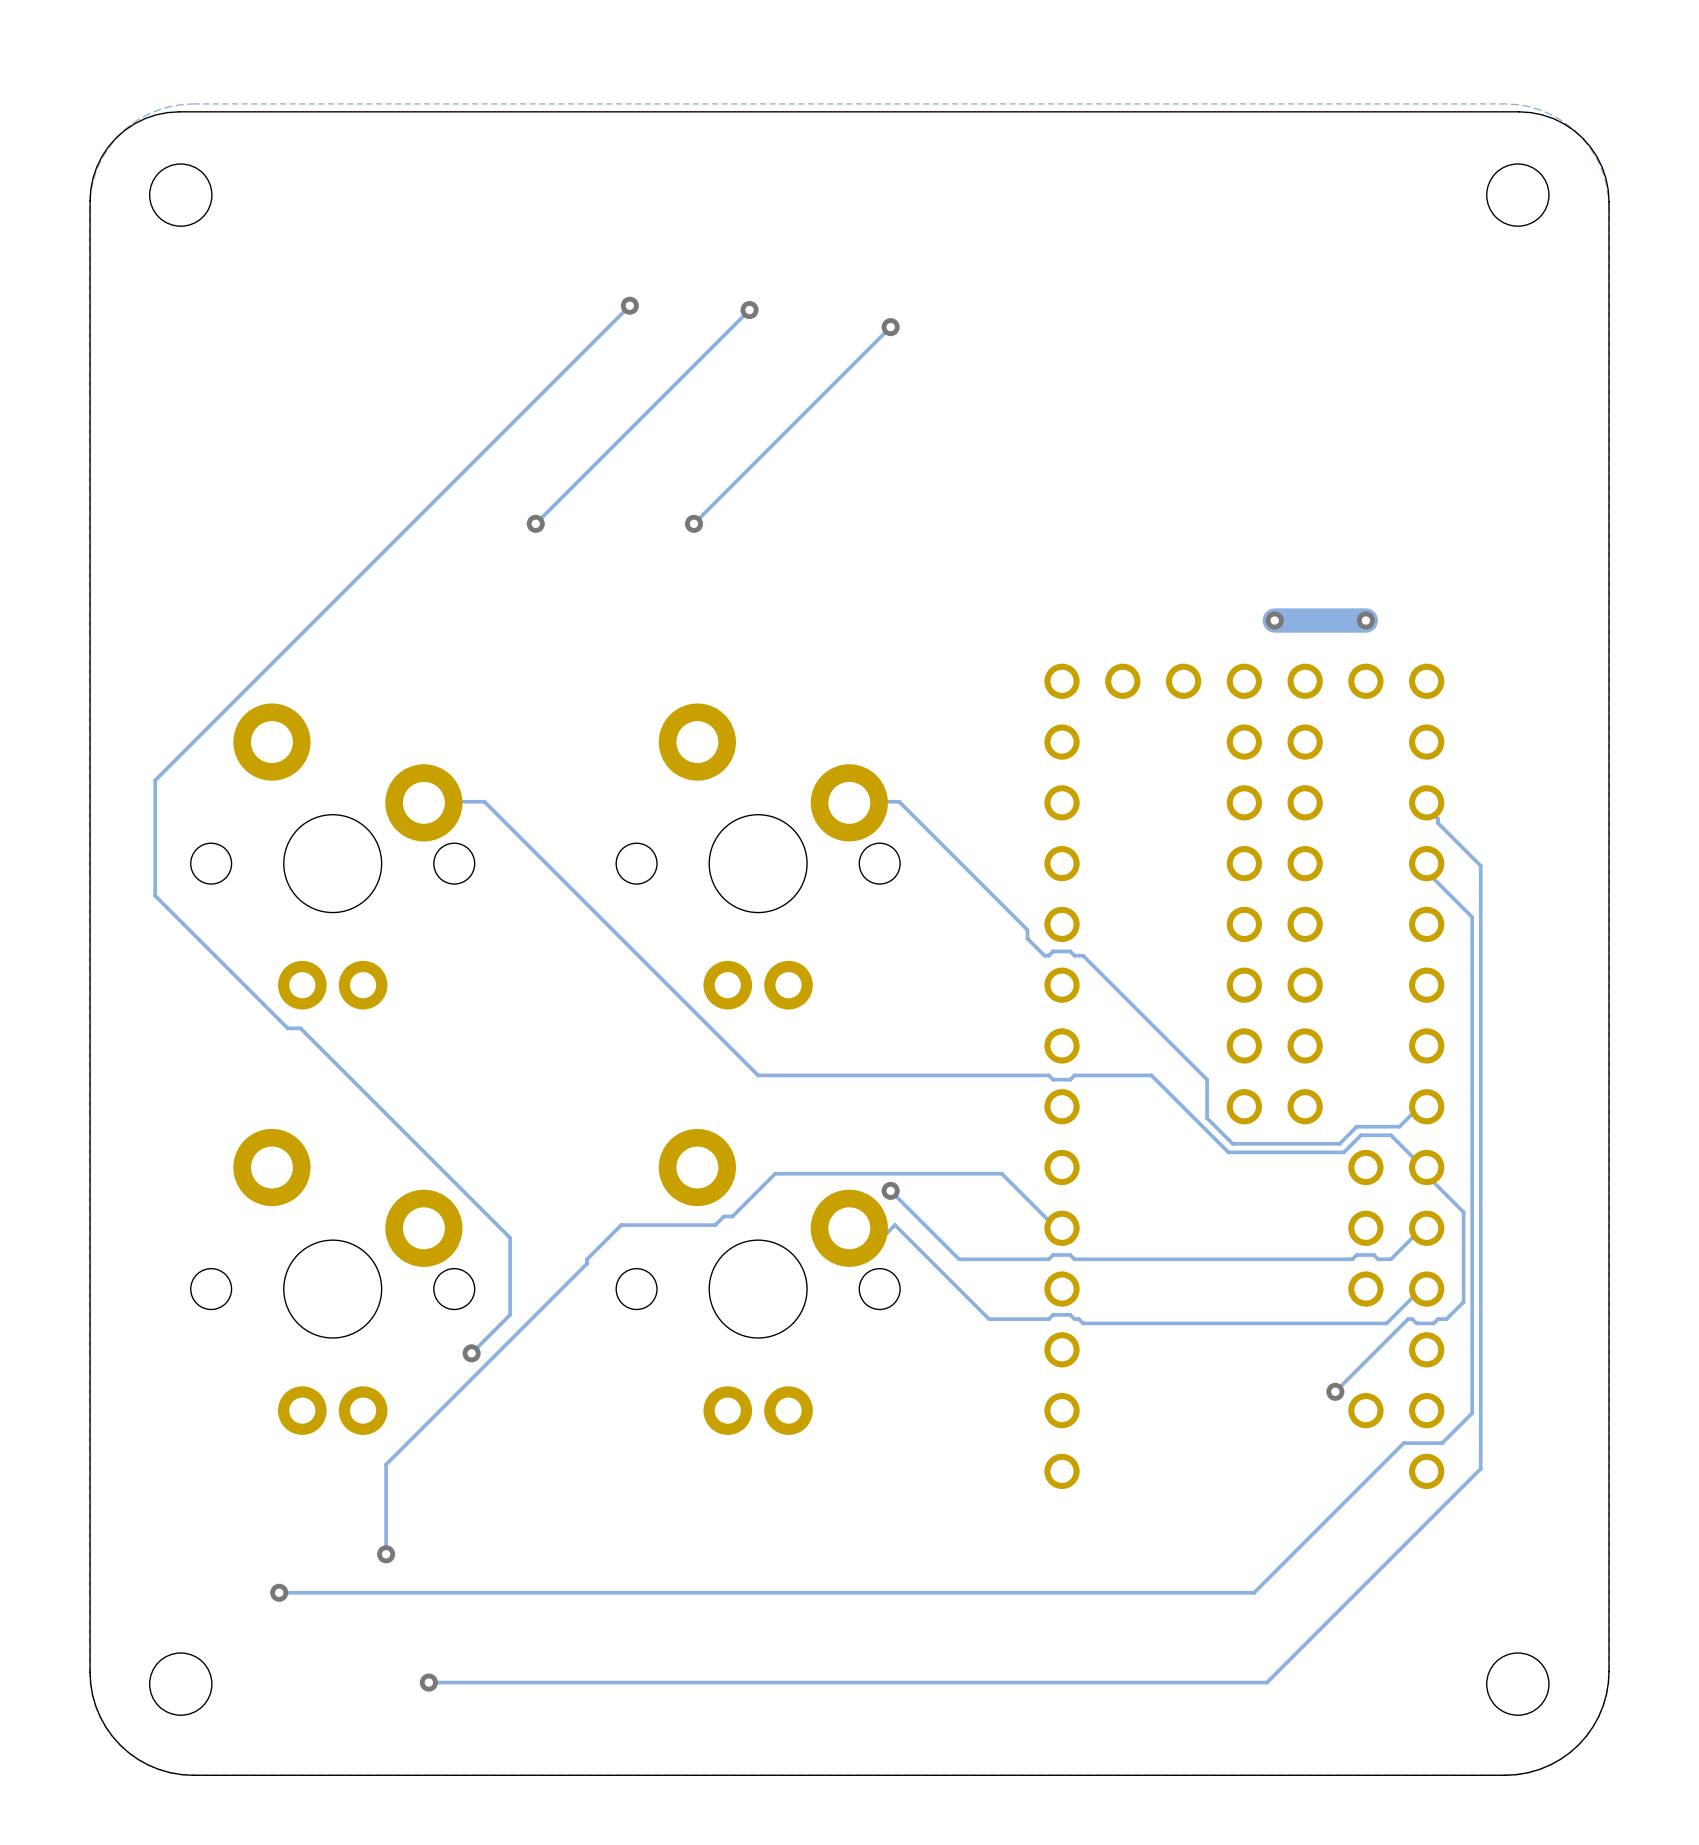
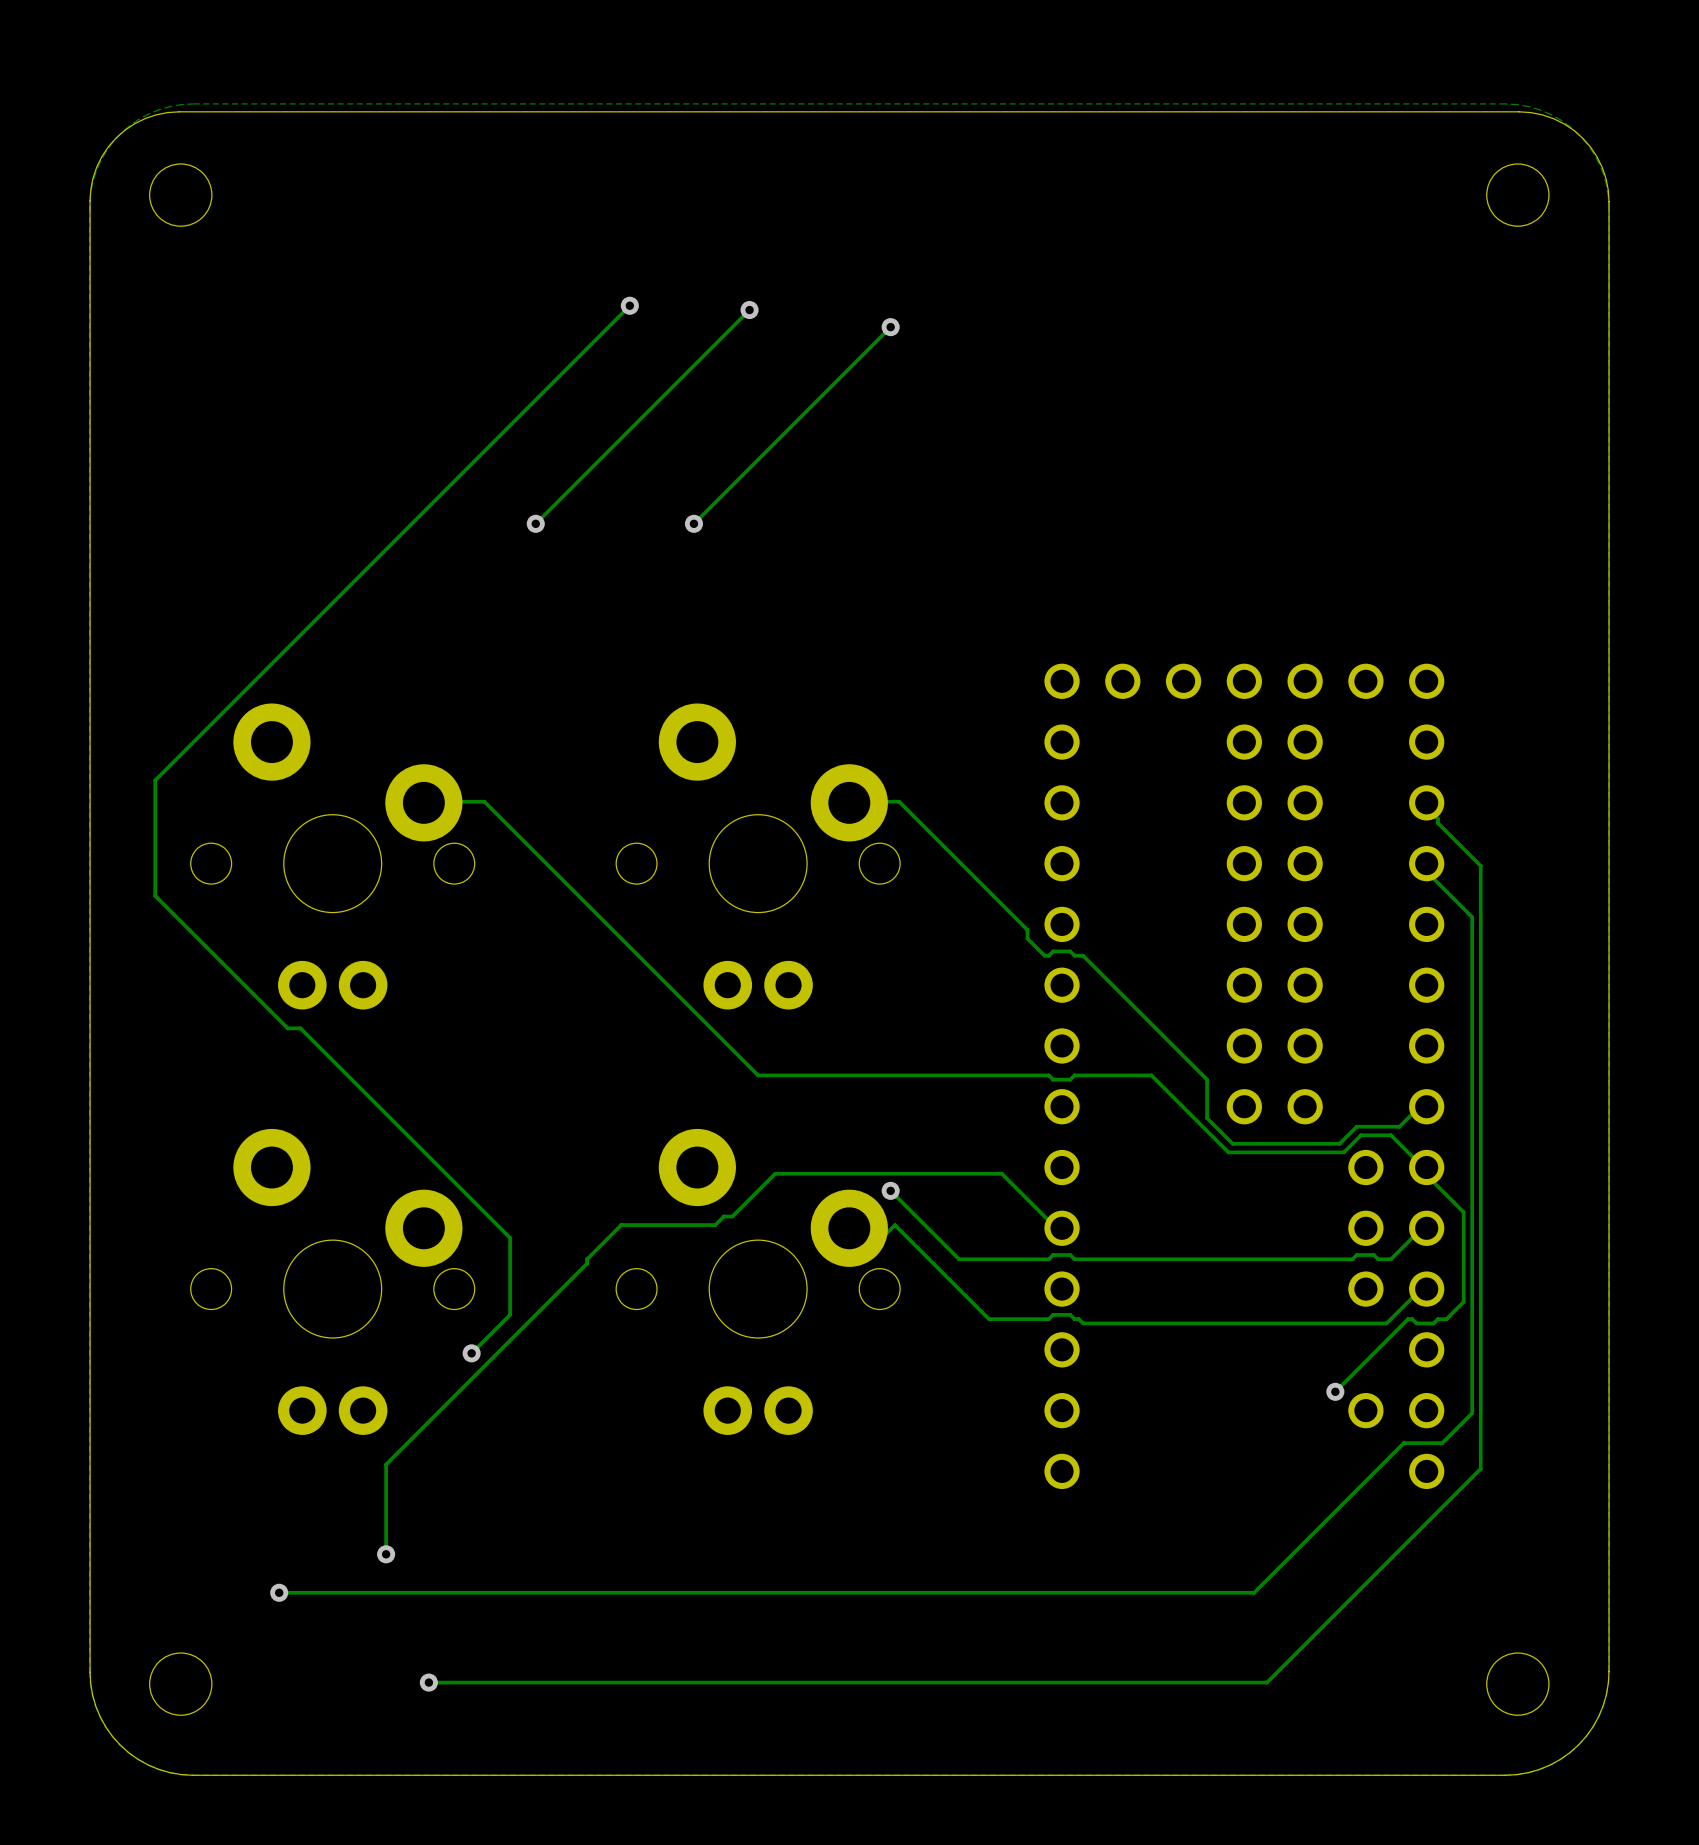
via: (1274, 620) -> none
track: (1365, 620) (1274, 620) -> none
via: (1365, 620) -> none

